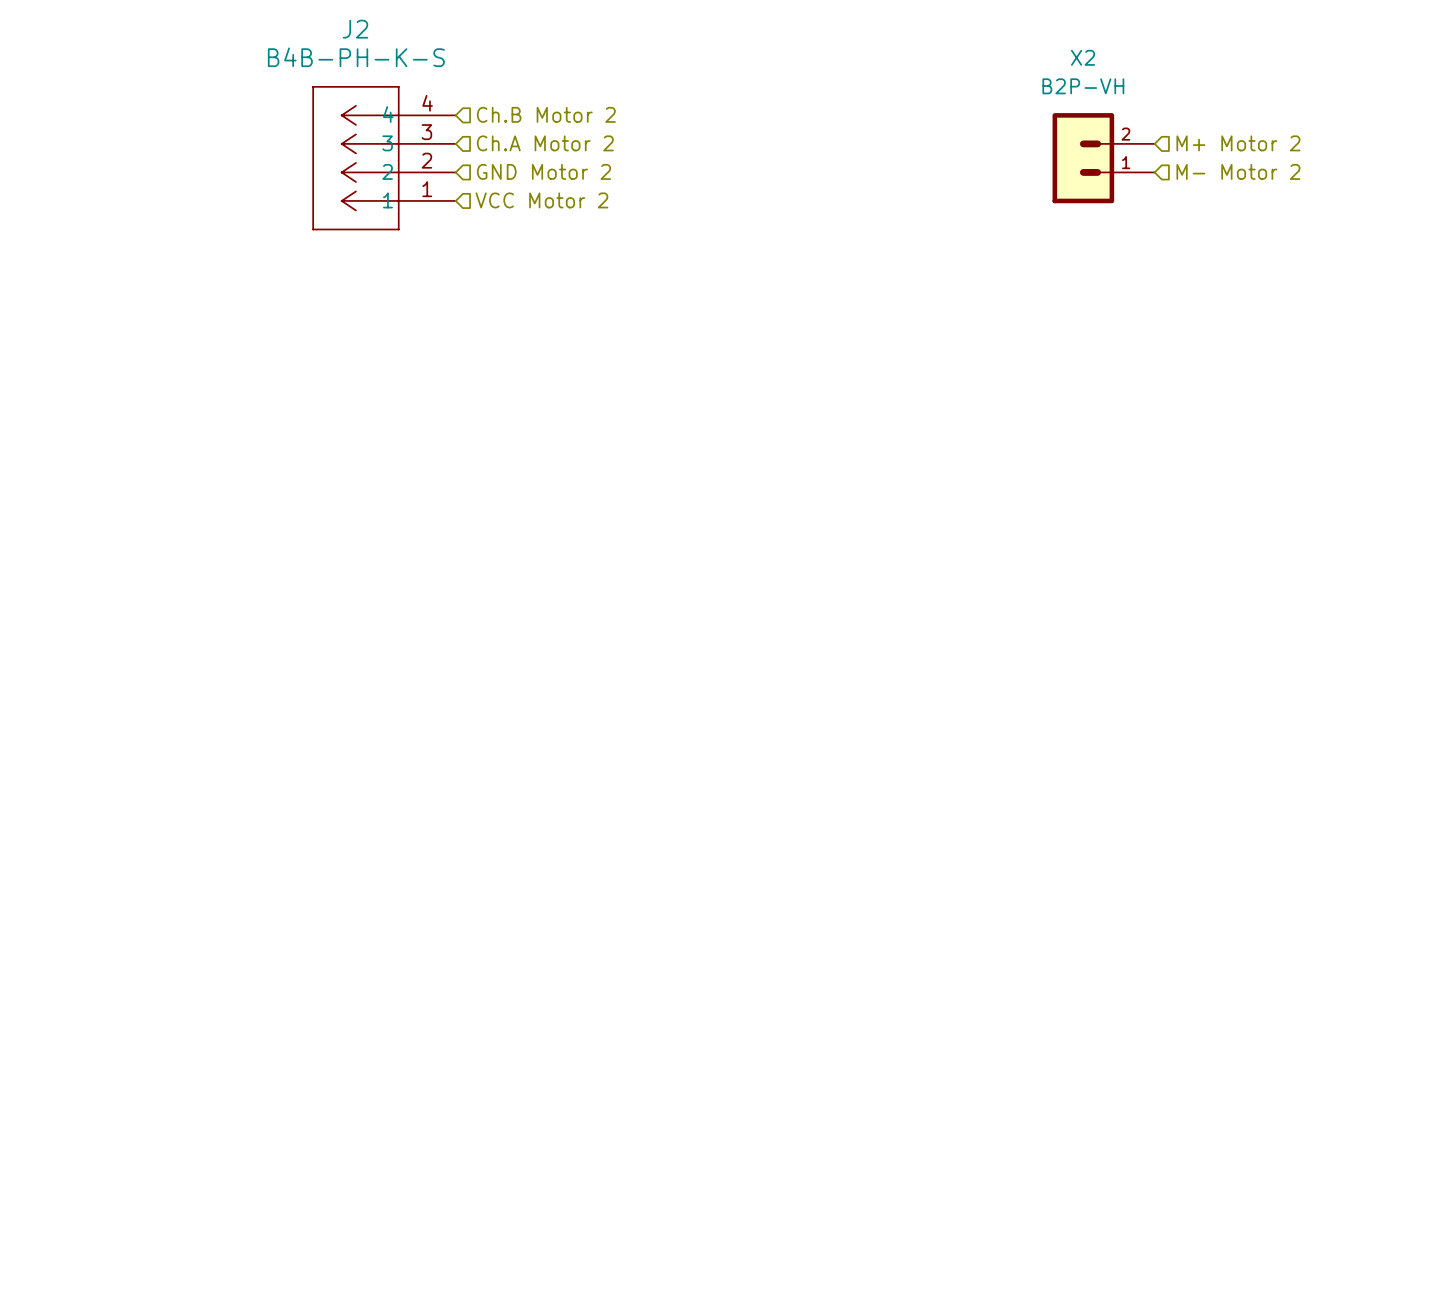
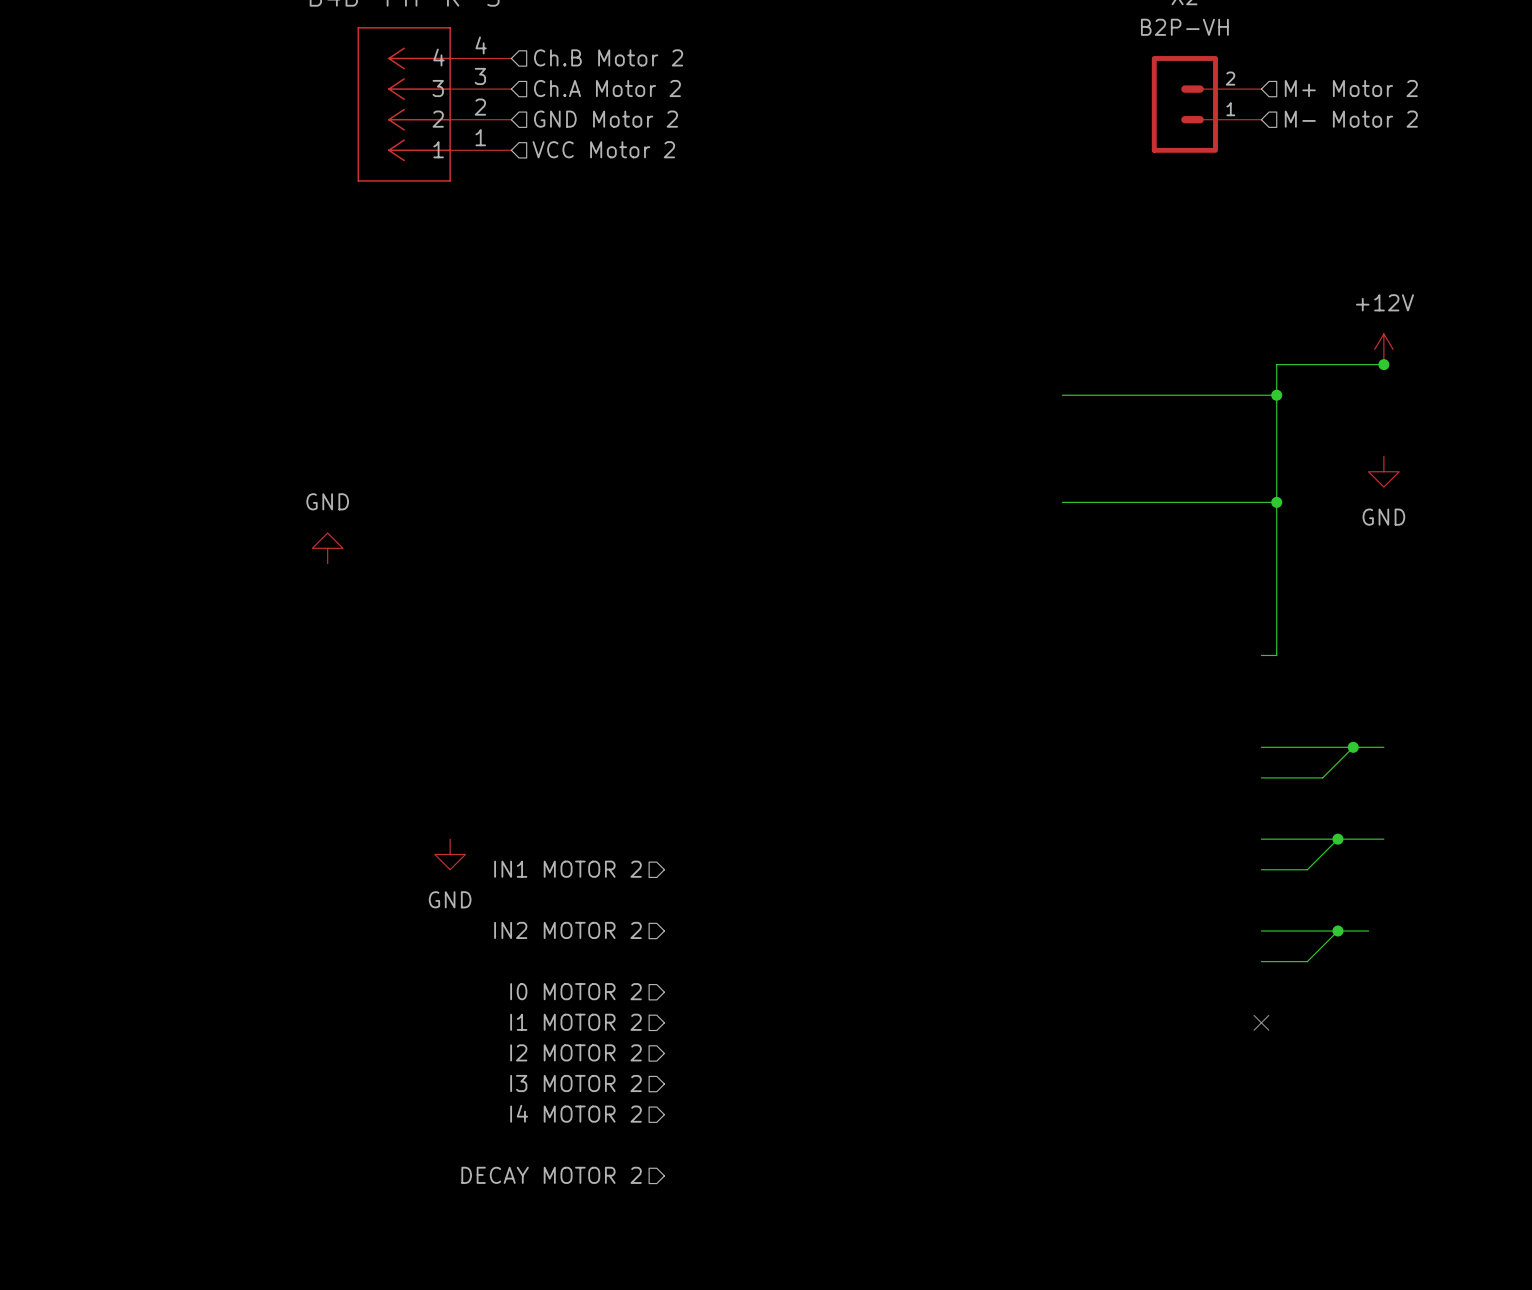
power symbol: none -> +12V (1383, 349)
wire: none -> (1383, 364) (1276, 364) (1276, 655) (1261, 655)
junction: none -> (1383, 364)
wire: none -> (1062, 395) (1276, 395)
junction: none -> (1276, 395)
power symbol: none -> GND (1383, 471)
wire: none -> (1062, 502) (1276, 502)
junction: none -> (1276, 502)
power symbol: none -> GND (327, 548)
wire: none -> (1261, 747) (1383, 747)
wire: none -> (1353, 747) (1322, 777) (1261, 777)
junction: none -> (1353, 747)
wire: none -> (1261, 839) (1383, 839)
wire: none -> (1337, 839) (1307, 869) (1261, 869)
junction: none -> (1337, 839)
power symbol: none -> GND (450, 854)
hierarchical label: none -> IN1 MOTOR 2 (567, 869)
hierarchical label: none -> IN2 MOTOR 2 (567, 930)
wire: none -> (1261, 930) (1368, 930)
wire: none -> (1337, 930) (1307, 961) (1261, 961)
junction: none -> (1337, 930)
hierarchical label: none -> I0 MOTOR 2 (576, 991)
hierarchical label: none -> I1 MOTOR 2 (576, 1022)
no-connect mark: none -> (1261, 1022)
hierarchical label: none -> I2 MOTOR 2 (576, 1052)
hierarchical label: none -> I3 MOTOR 2 (576, 1083)
hierarchical label: none -> I4 MOTOR 2 (576, 1113)
hierarchical label: none -> DECAY MOTOR 2 (551, 1175)

